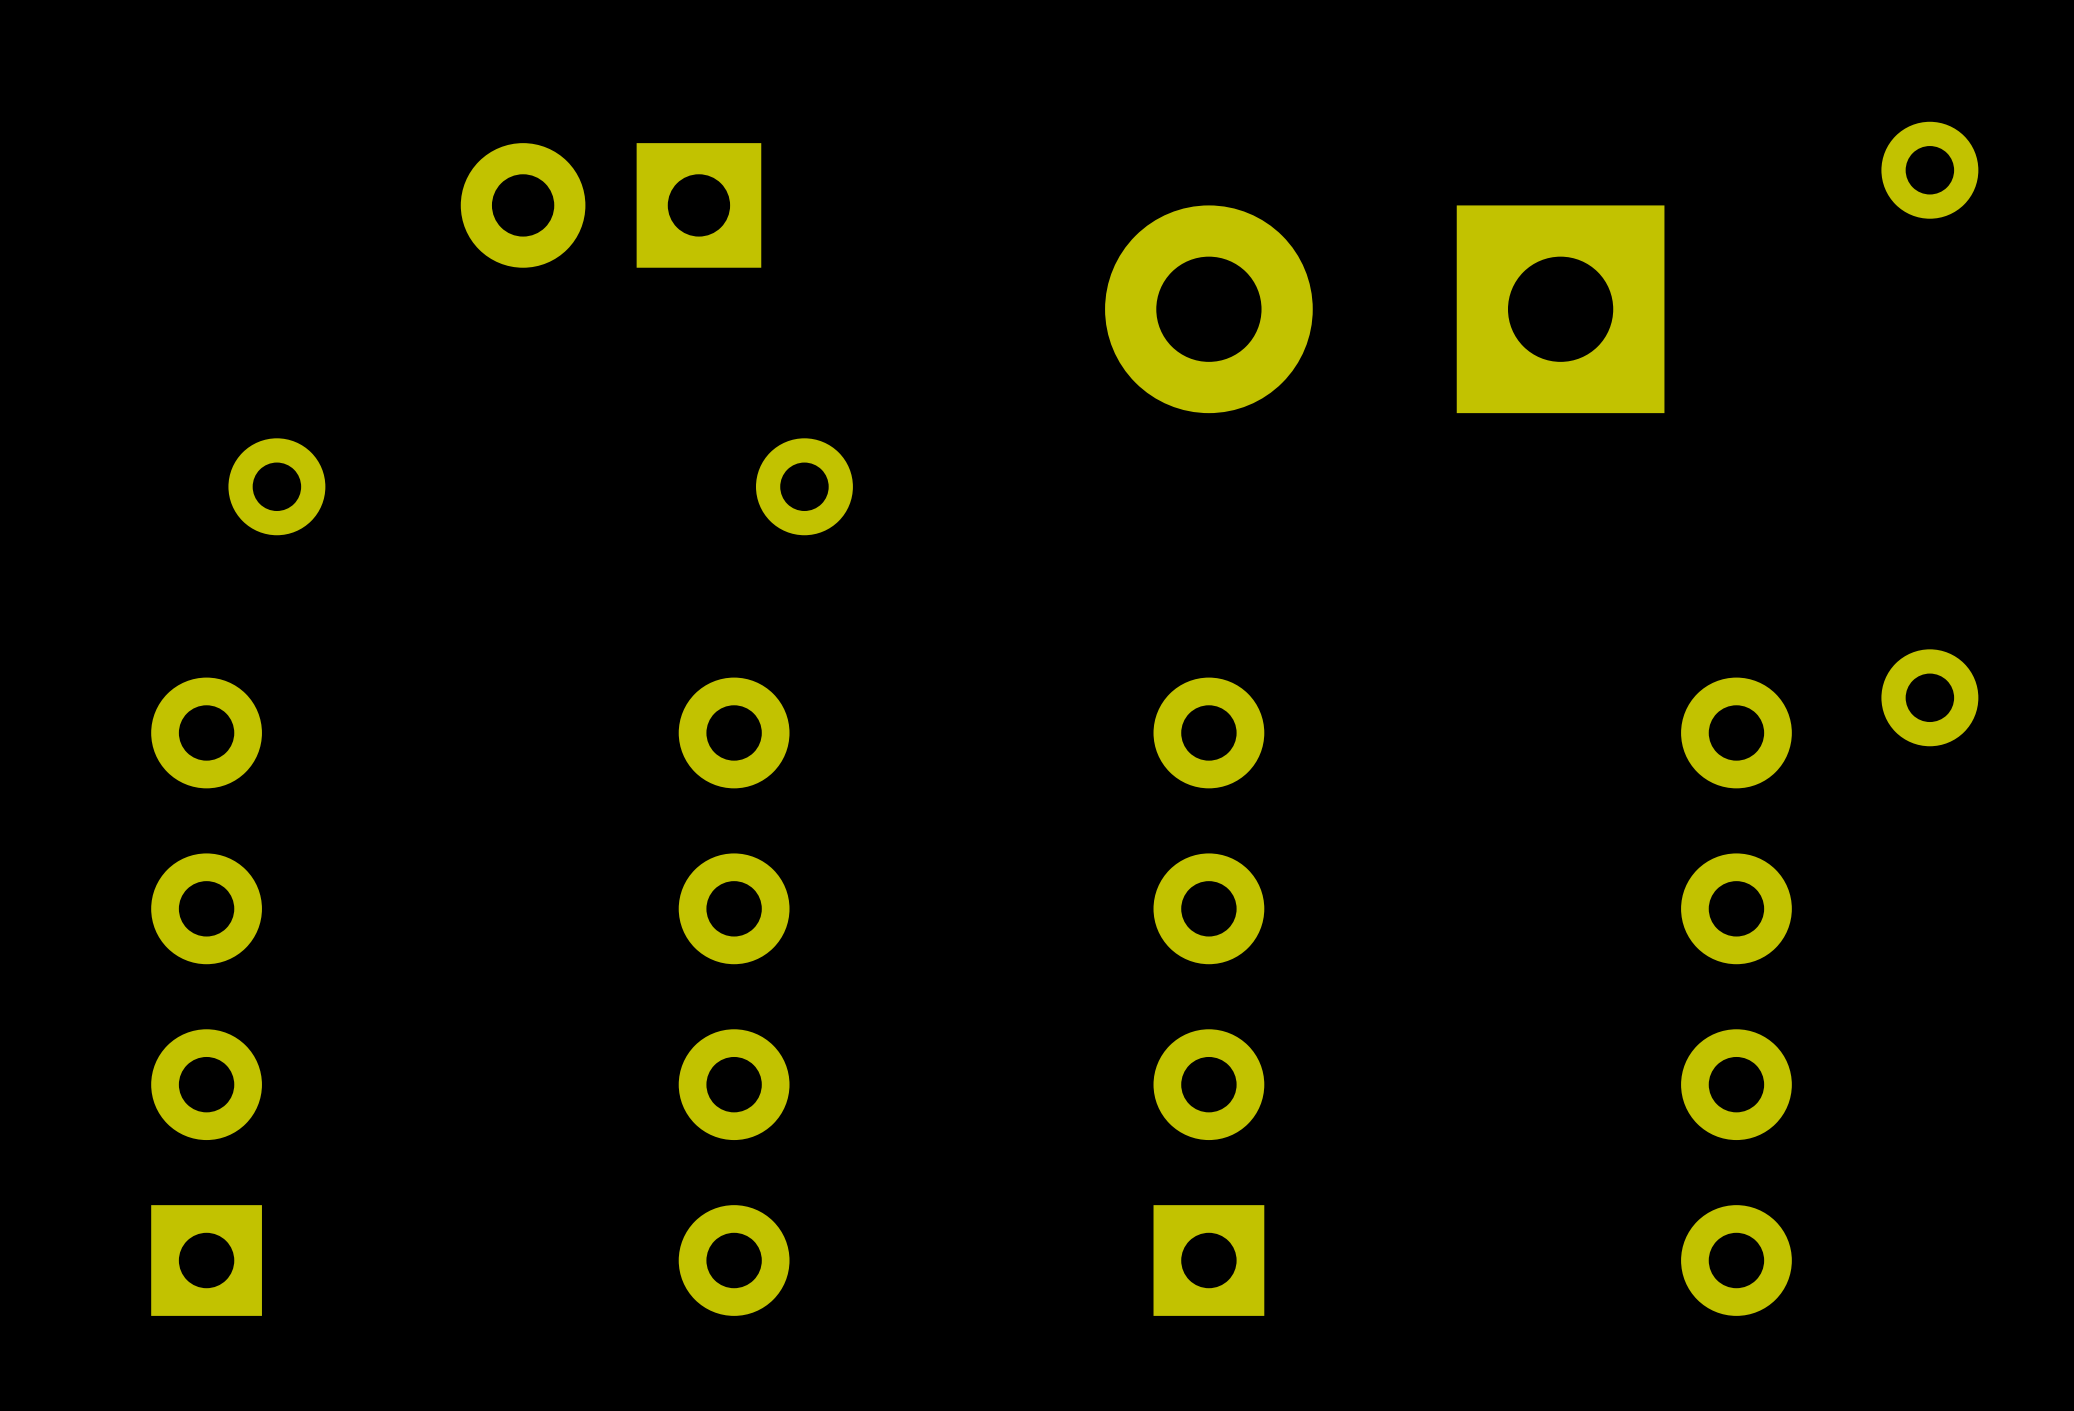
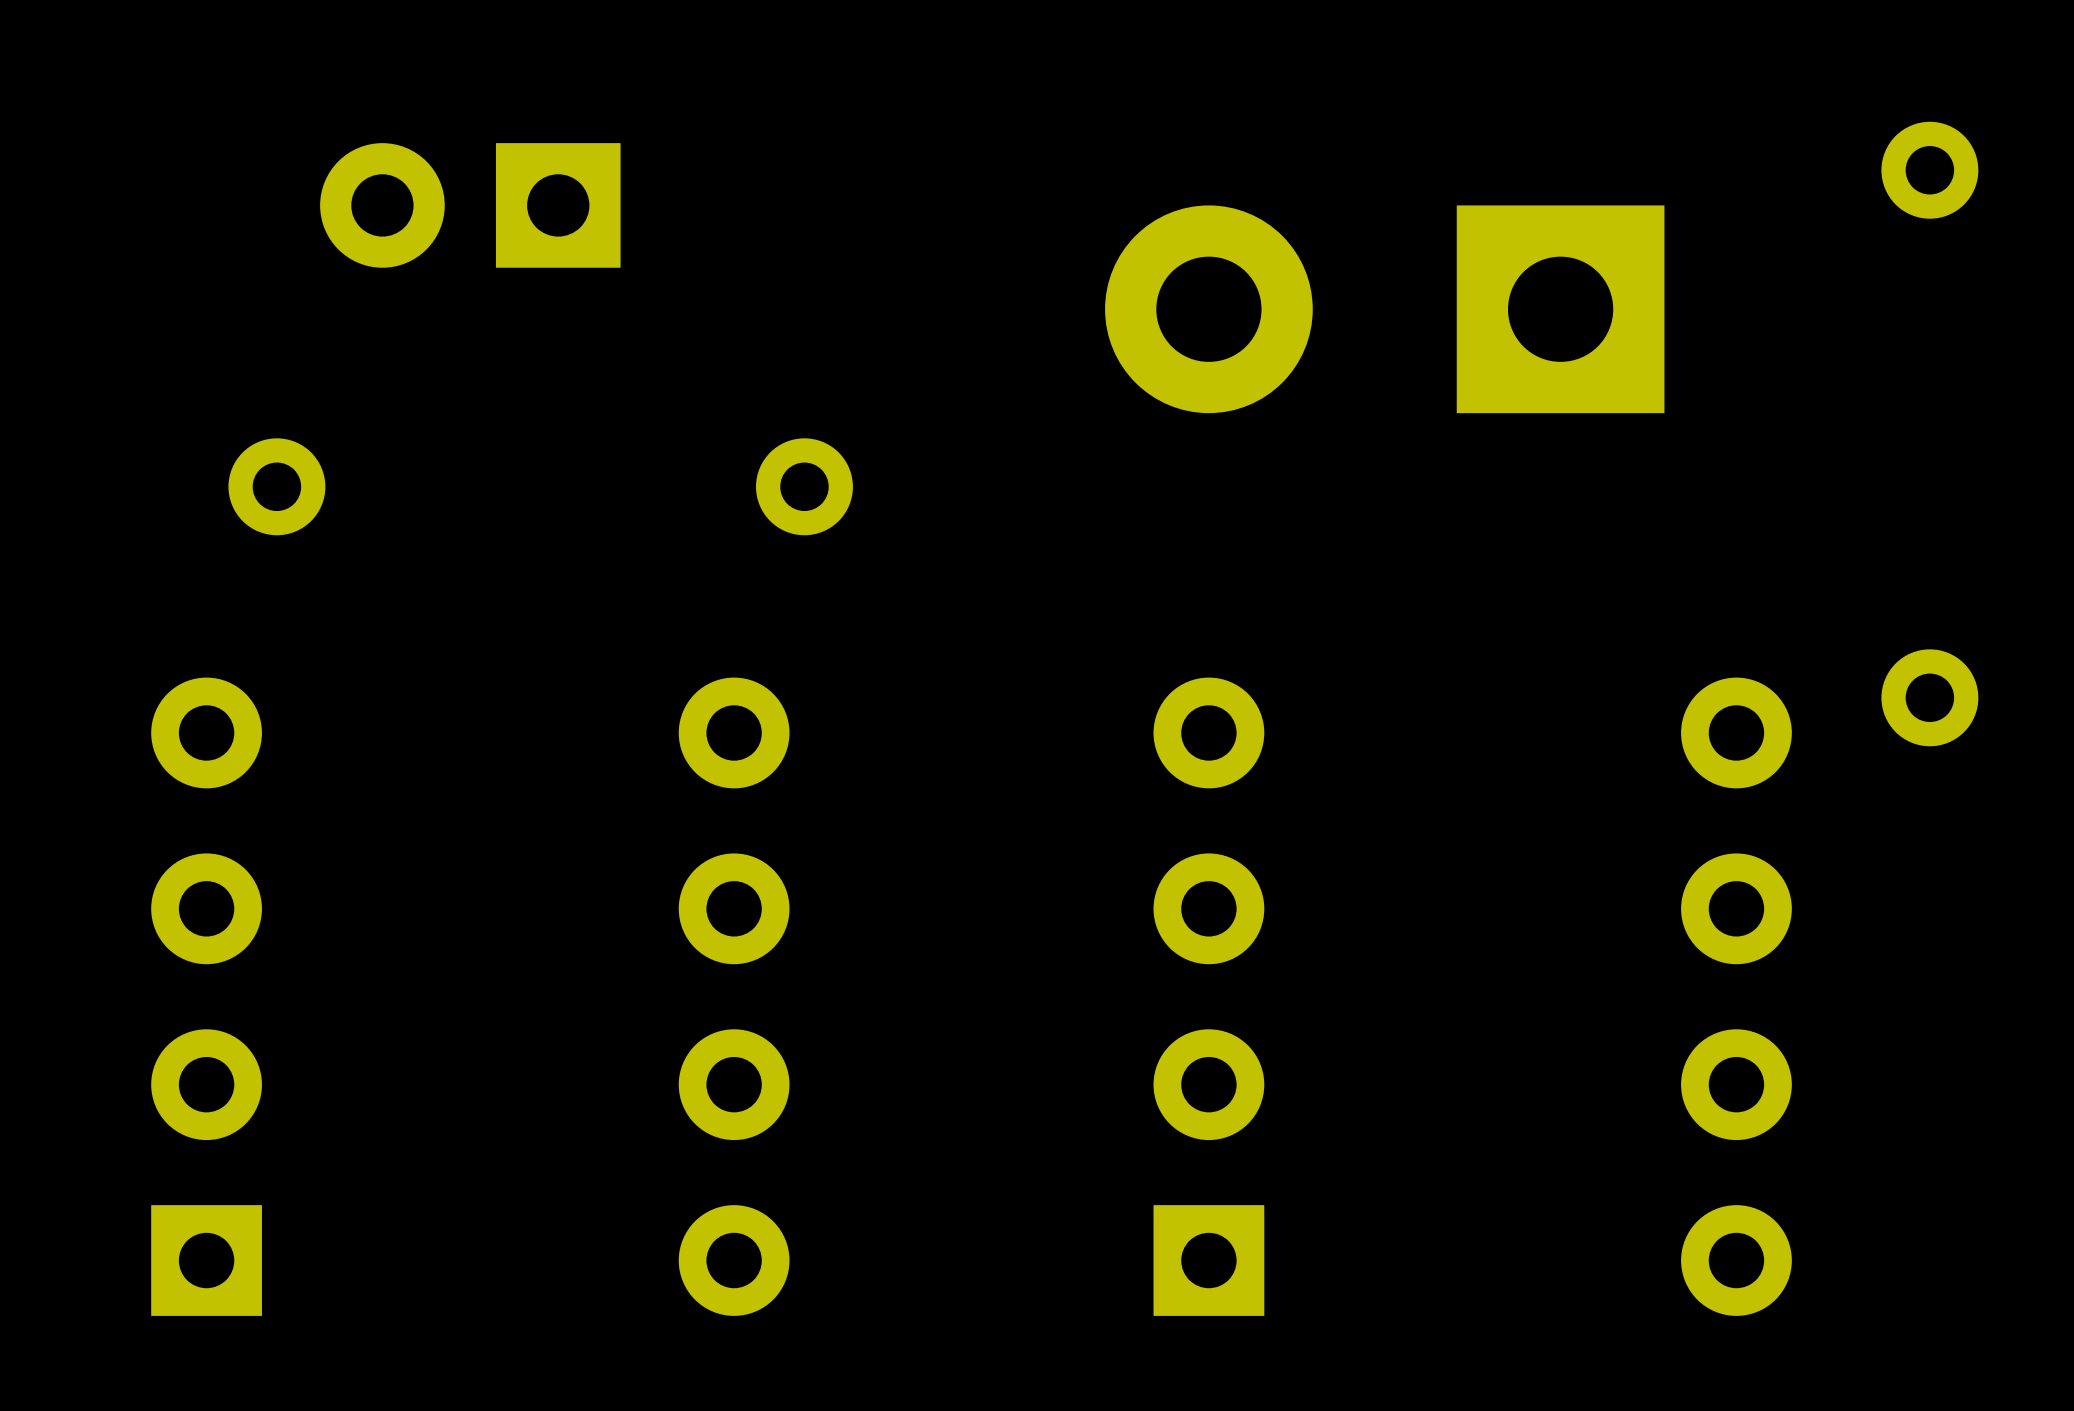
part position: (611, 205) -> (470, 205)

